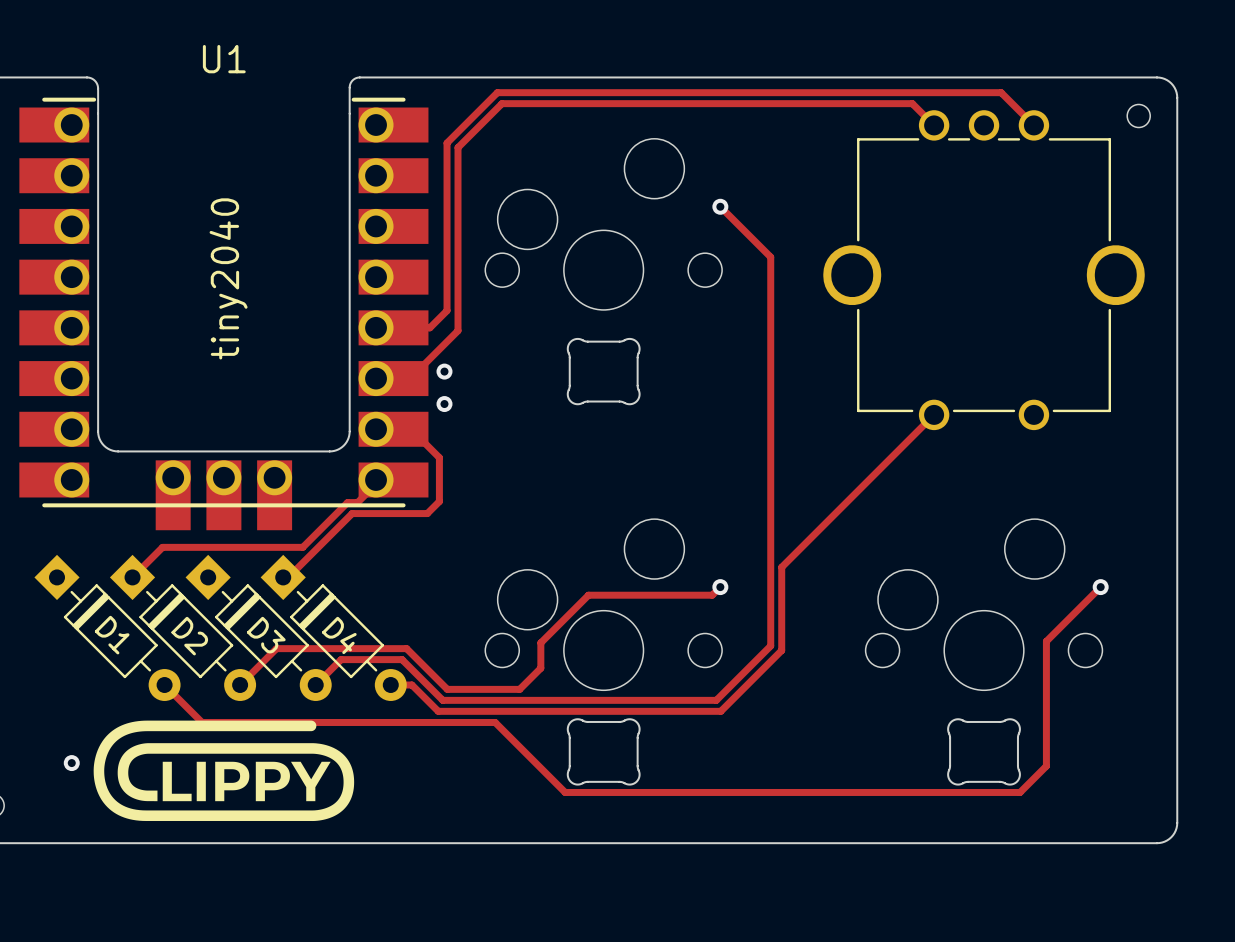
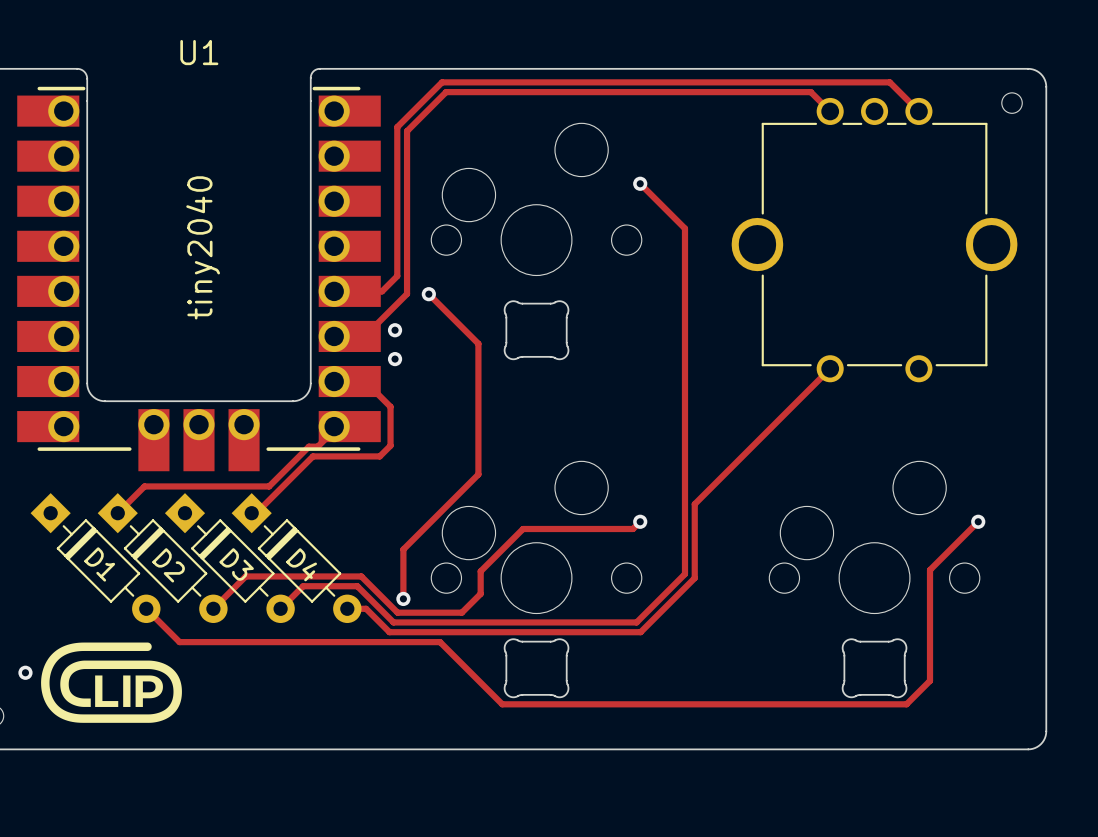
U1 footprint: [19, 97, 429, 531] -> [17, 86, 381, 472]
track: none -> (428, 294) (478, 343) (478, 474) (403, 549) (403, 598)
via: none -> (428, 294)
via: none -> (403, 598)
drawing: [93, 720, 355, 822] -> none
drawing: none -> [41, 642, 182, 723]
via: none -> (25, 672)
drawing shape: [162, 761, 192, 802] -> [135, 675, 163, 707]
via: (71, 763) -> none

